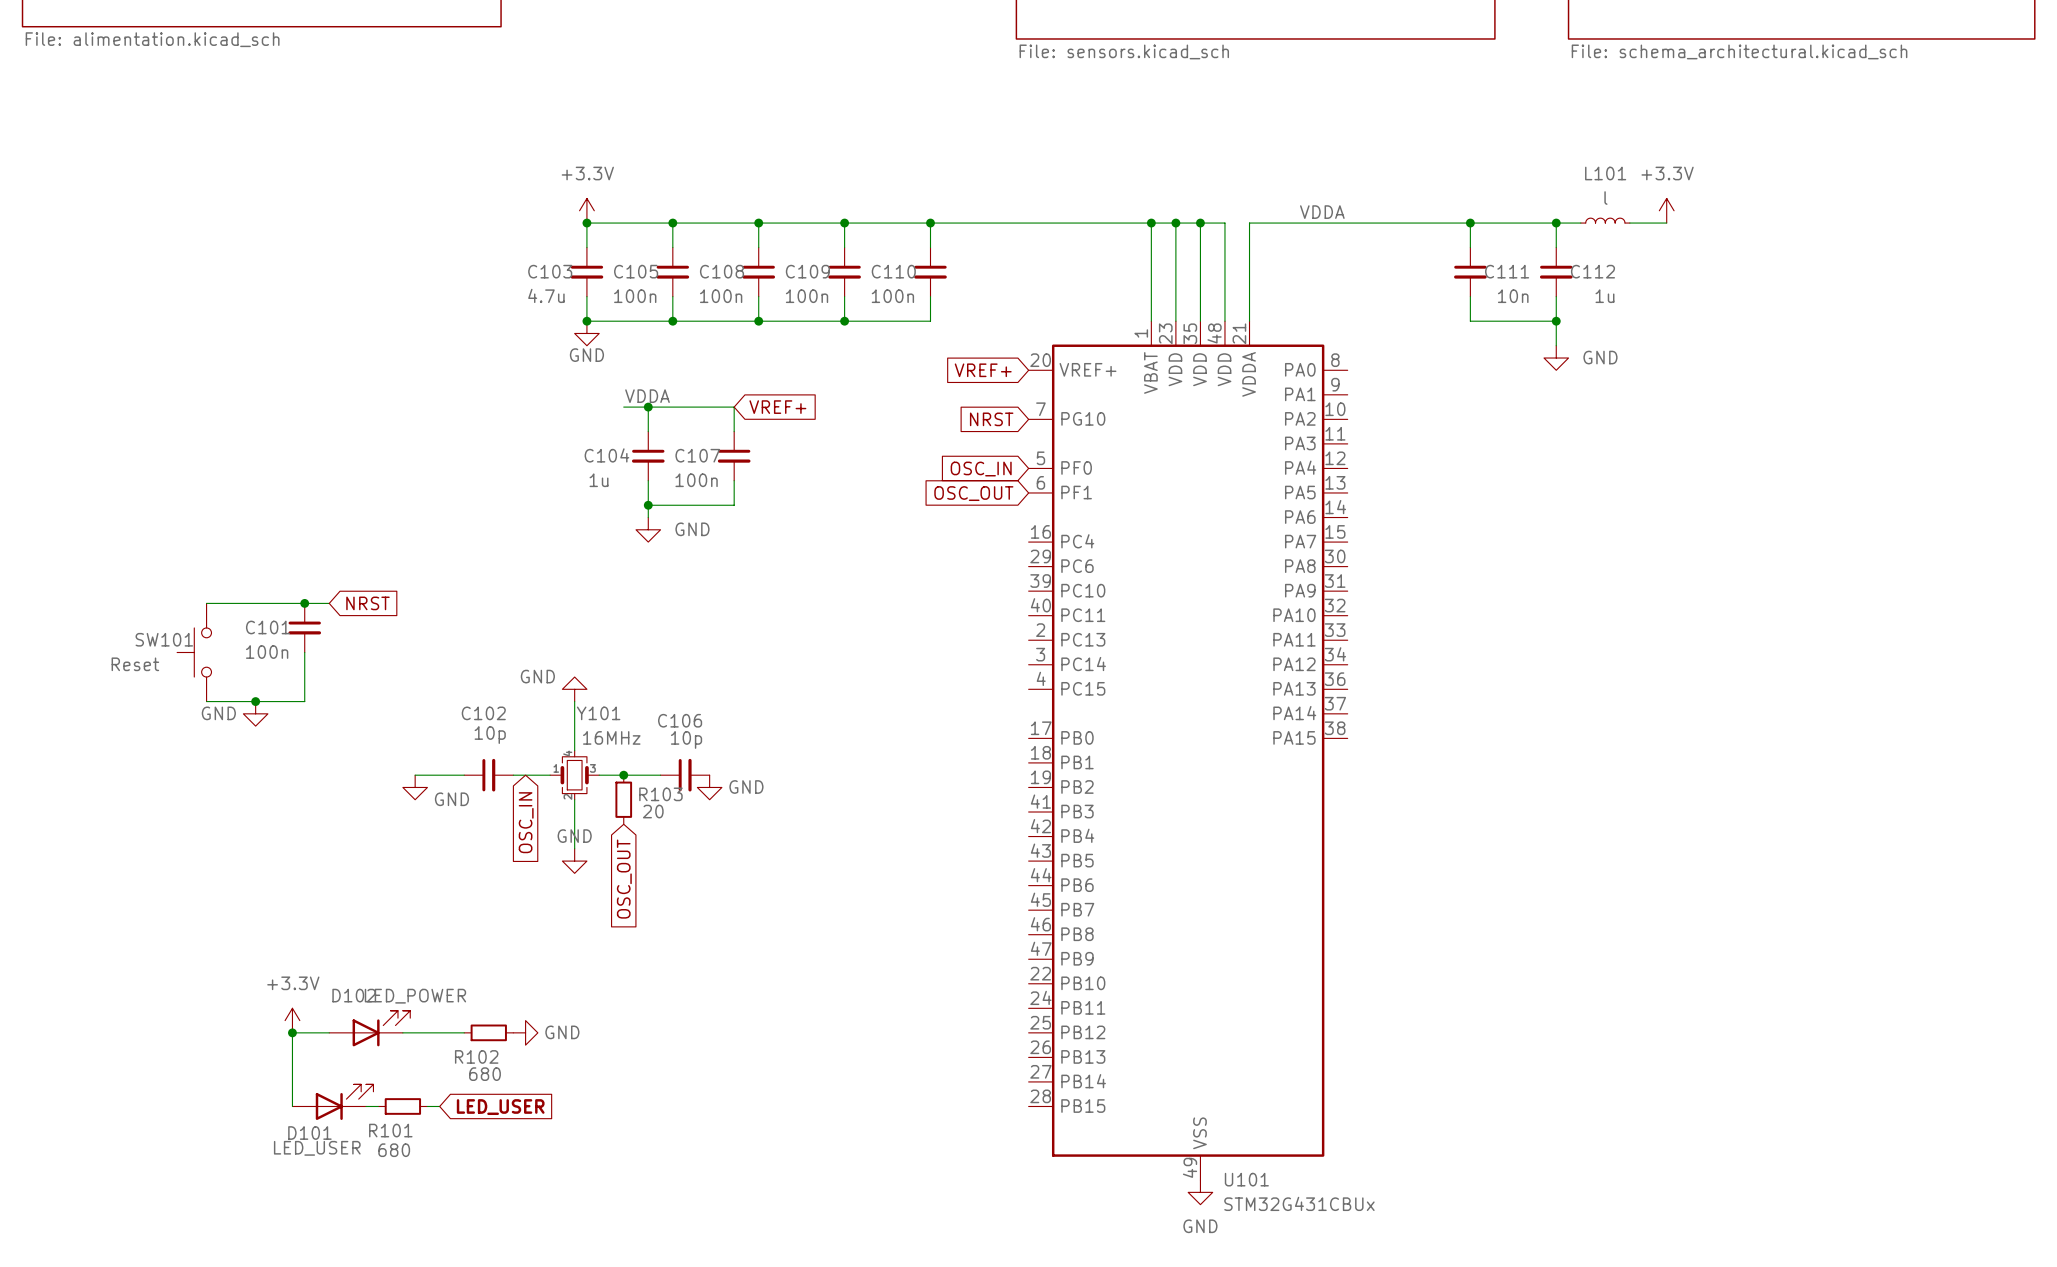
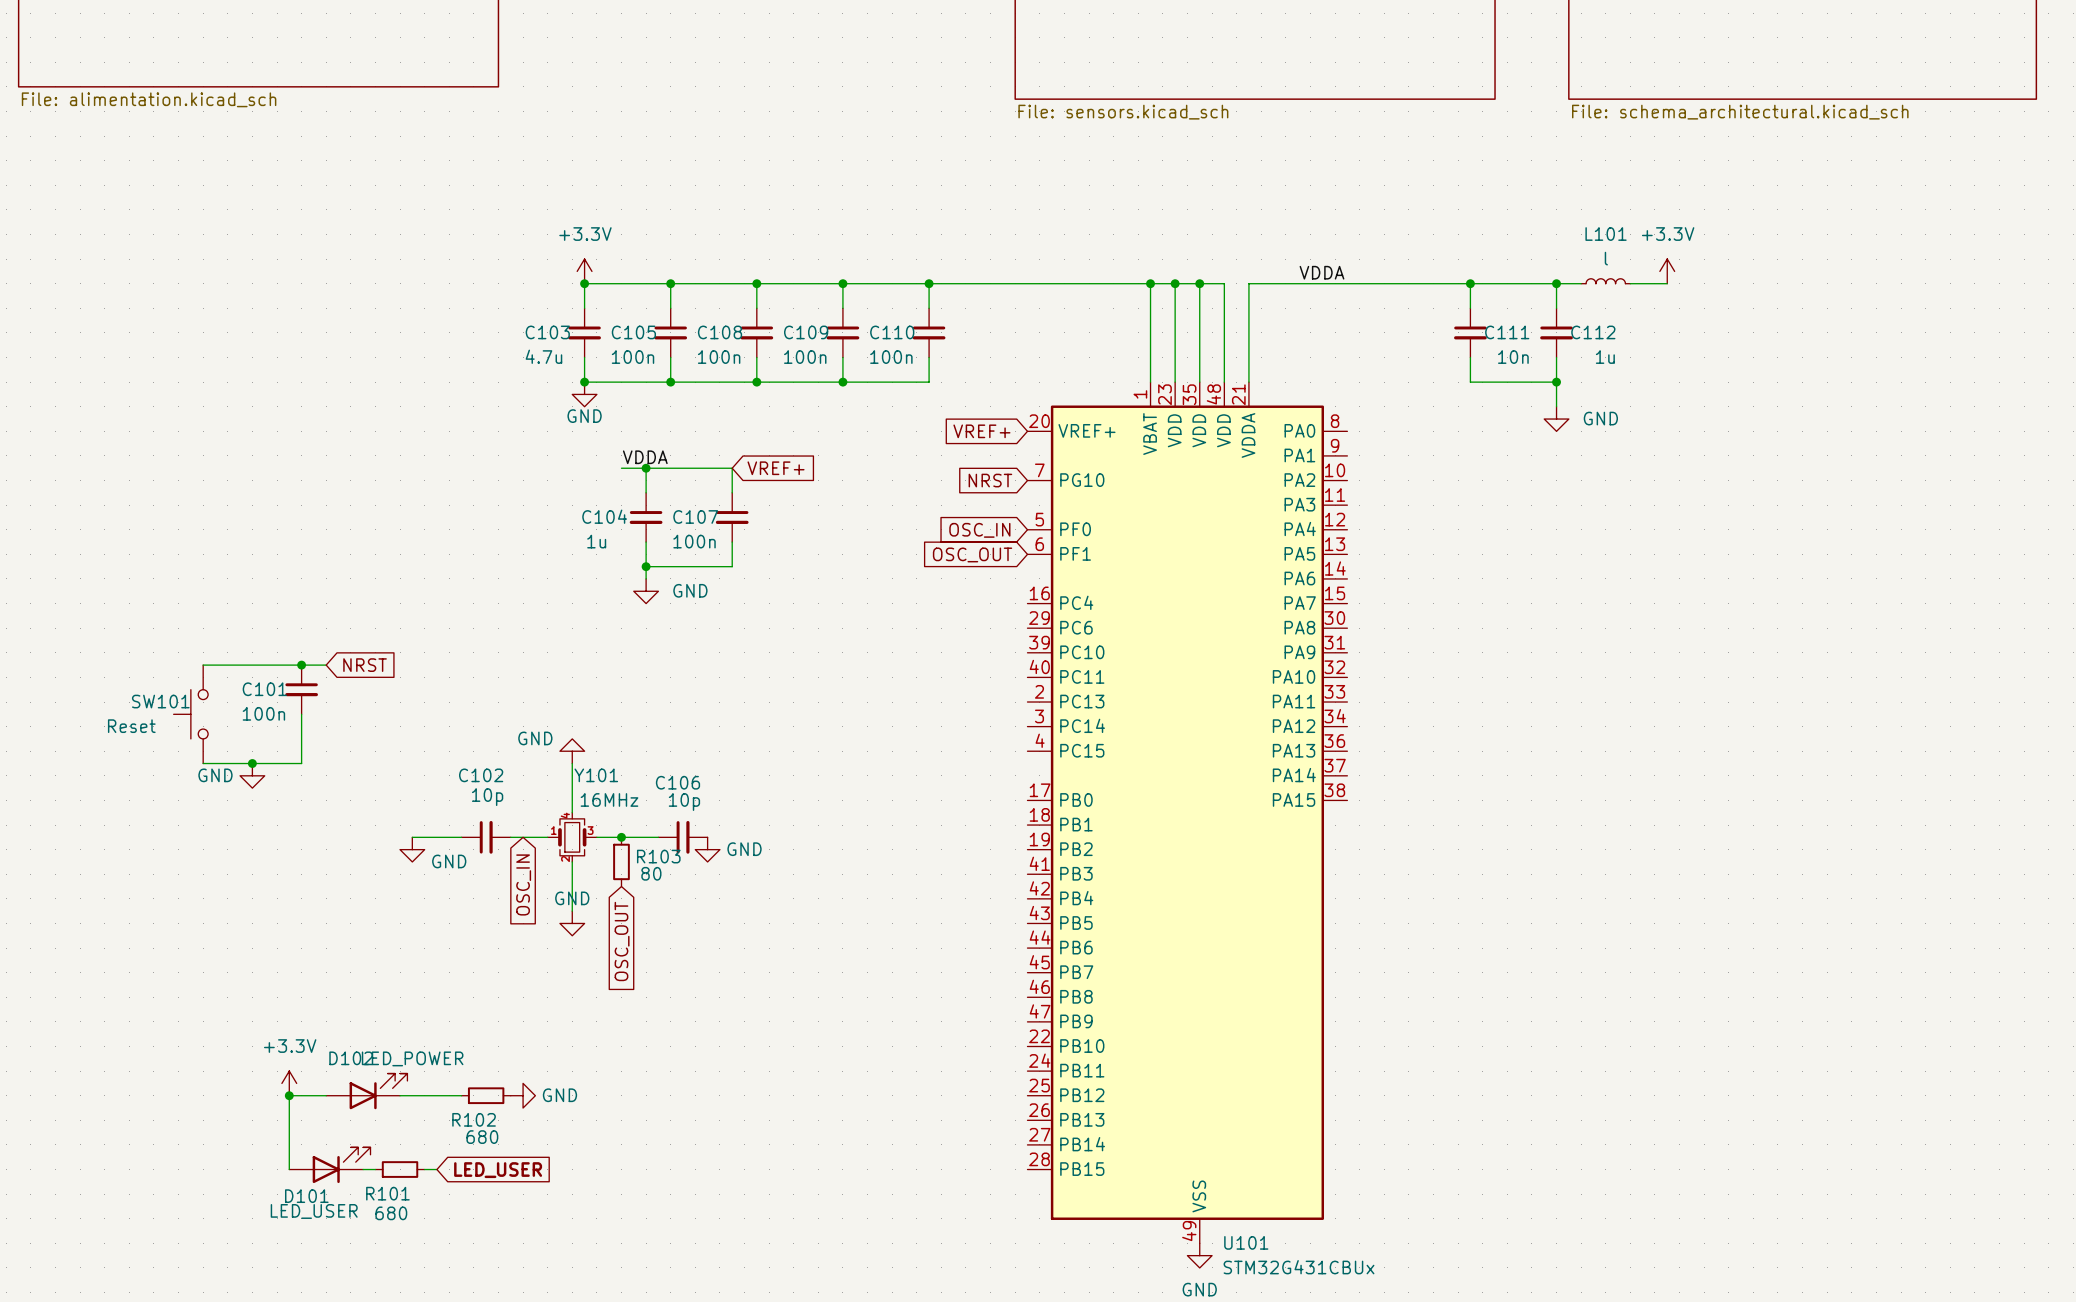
R103 value: 20 (653, 811) -> 80 (651, 873)

